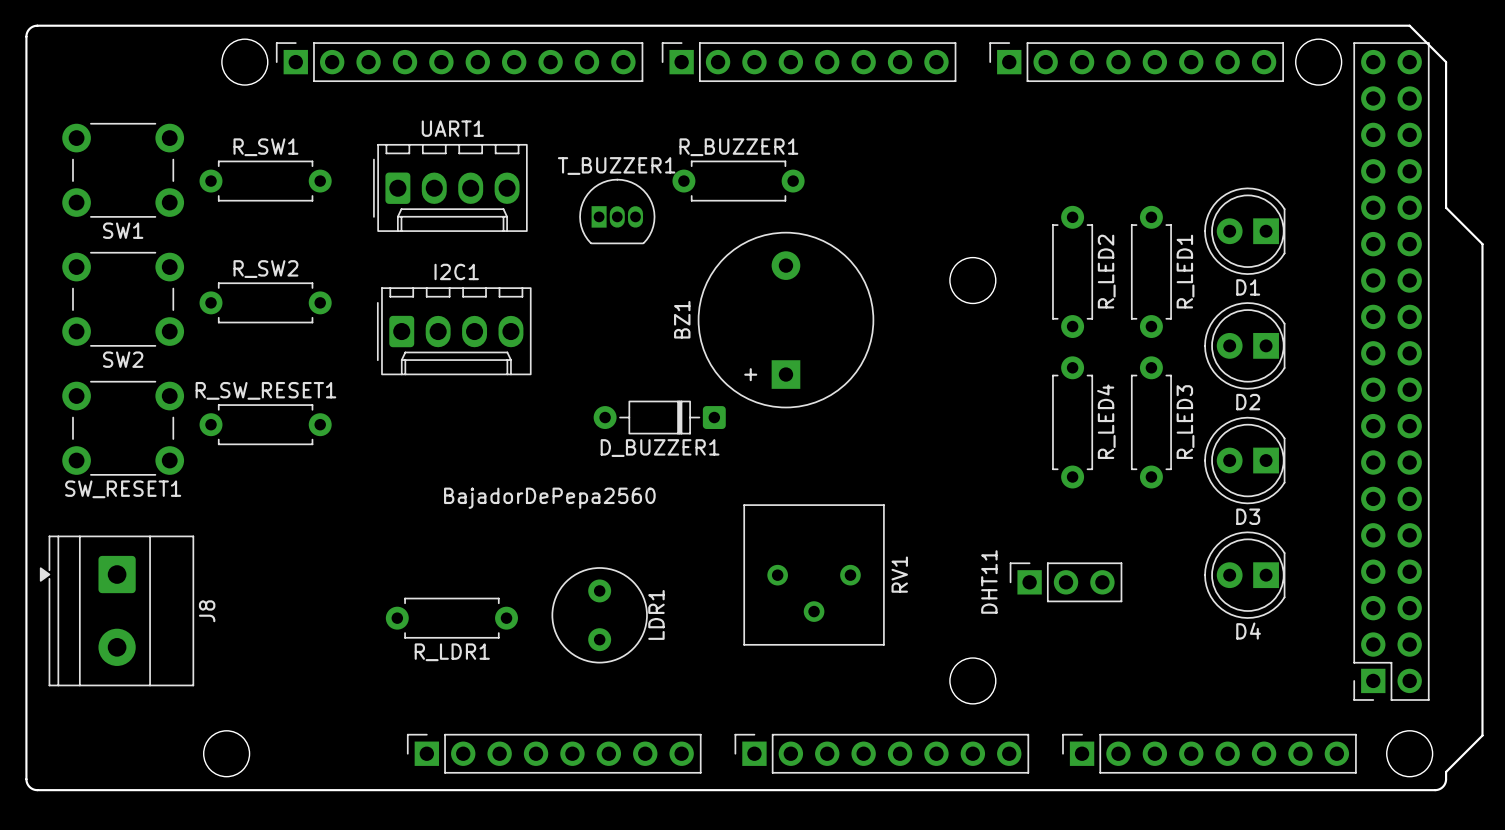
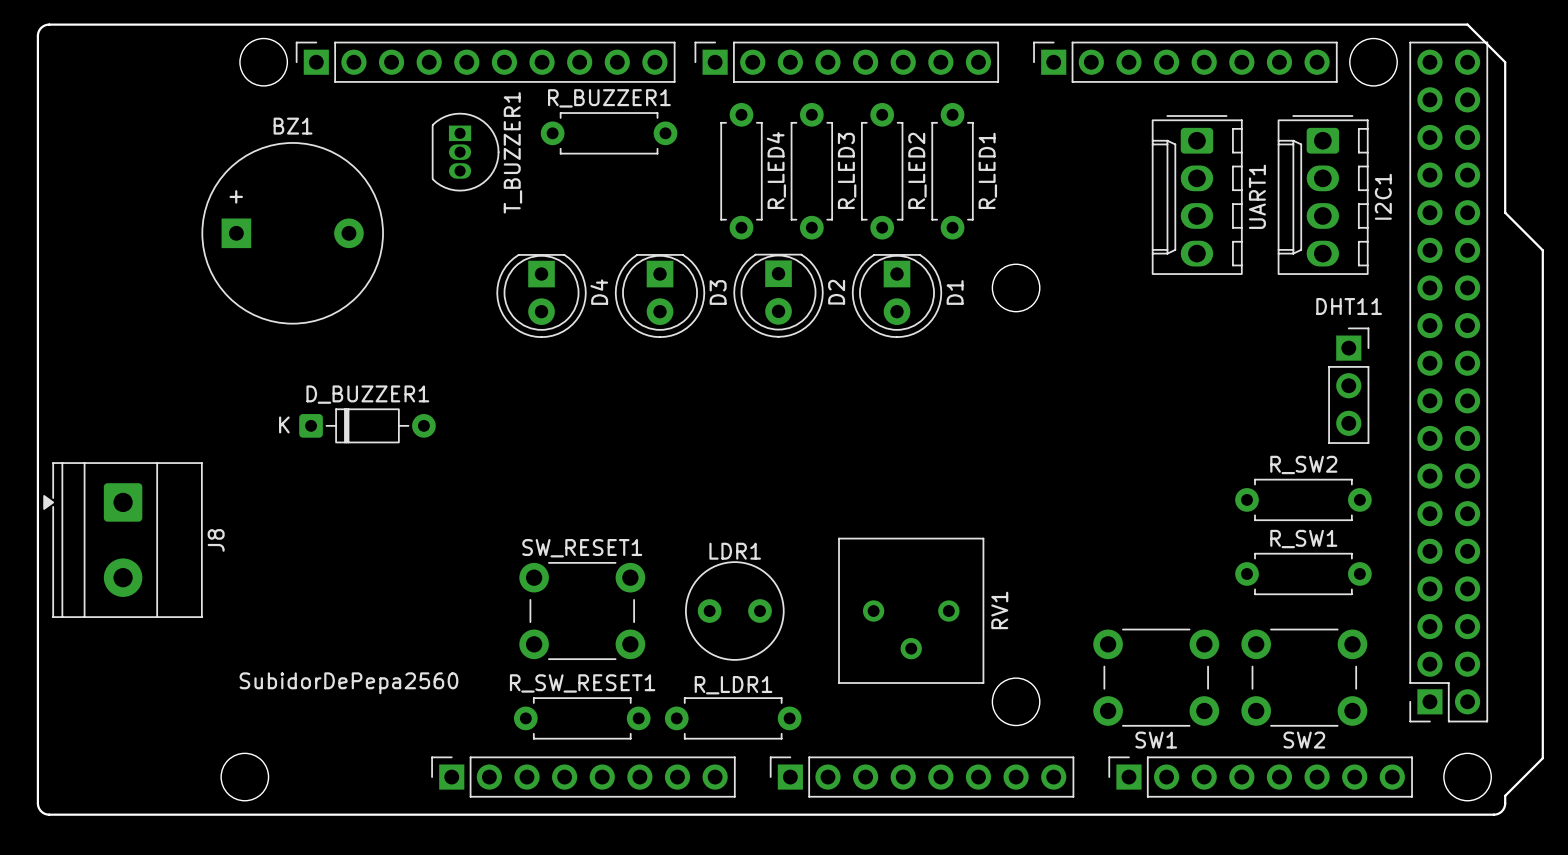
SW1 position: (123, 170) -> (1156, 677)
R_SW1 position: (265, 181) -> (1303, 573)
R_BUZZER1 position: (738, 181) -> (609, 133)
UART1 rotation: 0° (450, 187) -> 90° clockwise (1197, 195)
UART1 position: (450, 187) -> (1197, 195)
T_BUZZER1 rotation: 0° (617, 211) -> 90° clockwise (465, 152)
T_BUZZER1 position: (617, 211) -> (465, 152)
D1 rotation: 0° (1244, 231) -> 90° counterclockwise (897, 296)
D1 position: (1244, 231) -> (897, 296)
R_LED2 position: (1072, 271) -> (882, 171)
R_LED1 position: (1151, 271) -> (952, 171)
SW2 position: (123, 299) -> (1304, 677)
R_SW2 position: (265, 302) -> (1303, 499)
BZ1 rotation: 0° (785, 320) -> 90° clockwise (292, 233)
BZ1 position: (785, 320) -> (292, 233)
I2C1 rotation: 0° (454, 331) -> 90° clockwise (1323, 195)
I2C1 position: (454, 331) -> (1323, 195)
D2 rotation: 0° (1244, 345) -> 90° counterclockwise (778, 295)
D2 position: (1244, 345) -> (778, 295)
D_BUZZER1 footprint: [593, 400, 726, 435] -> [299, 408, 436, 444]
R_LED4 position: (1072, 422) -> (741, 171)
R_LED3 position: (1151, 422) -> (811, 171)
R_SW_RESET1 position: (265, 424) -> (582, 718)
SW_RESET1 position: (123, 428) -> (582, 611)
D_BUZZER1 name position: D_BUZZER1 (660, 448) -> D_BUZZER1 (367, 394)
D3 rotation: 0° (1244, 460) -> 90° counterclockwise (660, 296)
D3 position: (1244, 460) -> (660, 296)
SW_RESET1 name position: SW_RESET1 (123, 489) -> SW_RESET1 (582, 548)
text: BajadorDePepa2560 (549, 498) -> none
RV1 position: (814, 574) -> (911, 610)
D4 rotation: 0° (1244, 575) -> 90° counterclockwise (541, 296)
D4 position: (1244, 575) -> (541, 296)
DHT11 rotation: 0° (1066, 582) -> 90° clockwise (1348, 385)
DHT11 position: (1066, 582) -> (1348, 385)
J8 position: (117, 610) -> (123, 540)
LDR1 name position: LDR1 (656, 614) -> LDR1 (735, 551)
LDR1 rotation: 0° (599, 615) -> 90° clockwise (734, 611)
LDR1 position: (599, 615) -> (734, 611)
R_LDR1 position: (451, 618) -> (733, 718)
R_LDR1 name position: R_LDR1 (452, 652) -> R_LDR1 (733, 685)
text: none -> SubidorDePepa2560 (348, 683)

